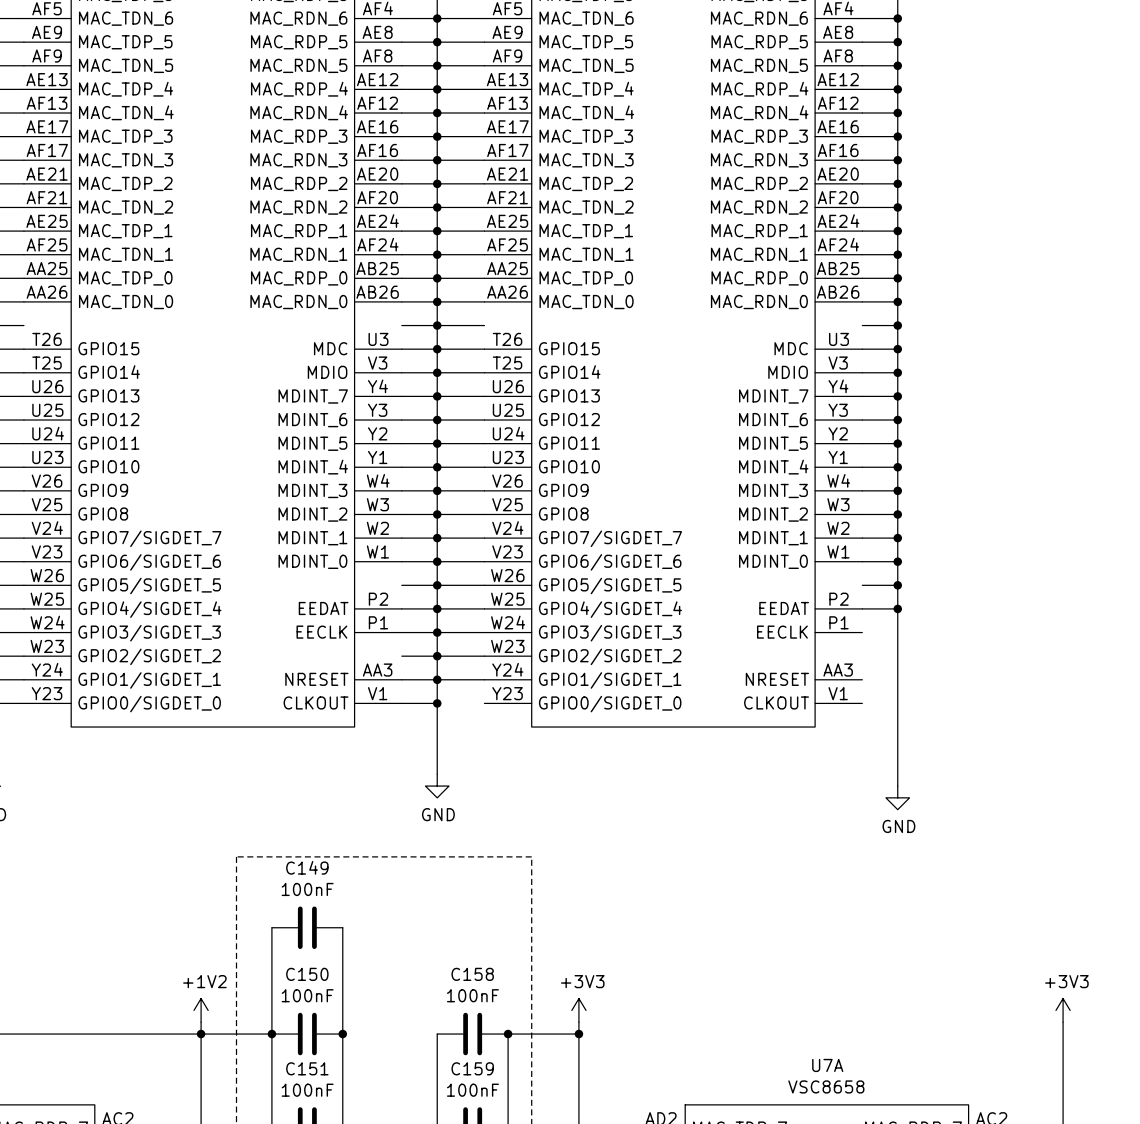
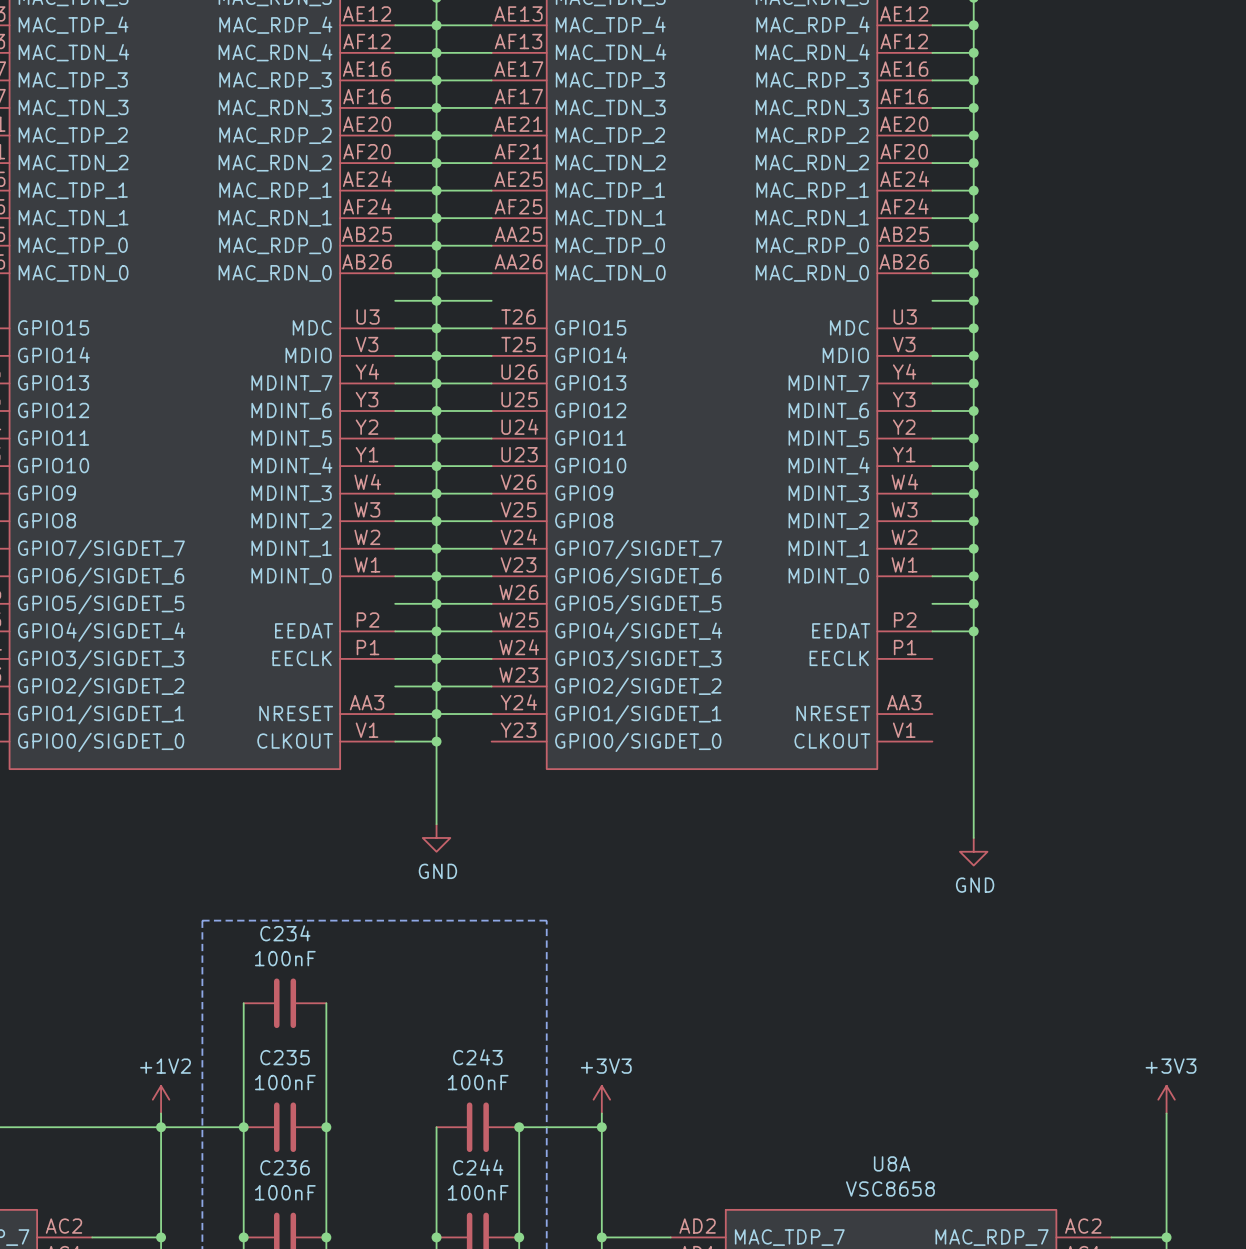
C149 name: C149 (307, 867) -> C234 (285, 933)
C150 name: C150 (307, 974) -> C235 (285, 1057)
C158 name: C158 (472, 974) -> C243 (477, 1057)
U7A name: U7A (827, 1065) -> U8A (892, 1163)
C151 name: C151 (307, 1068) -> C236 (285, 1167)
C159 name: C159 (472, 1068) -> C244 (478, 1167)

